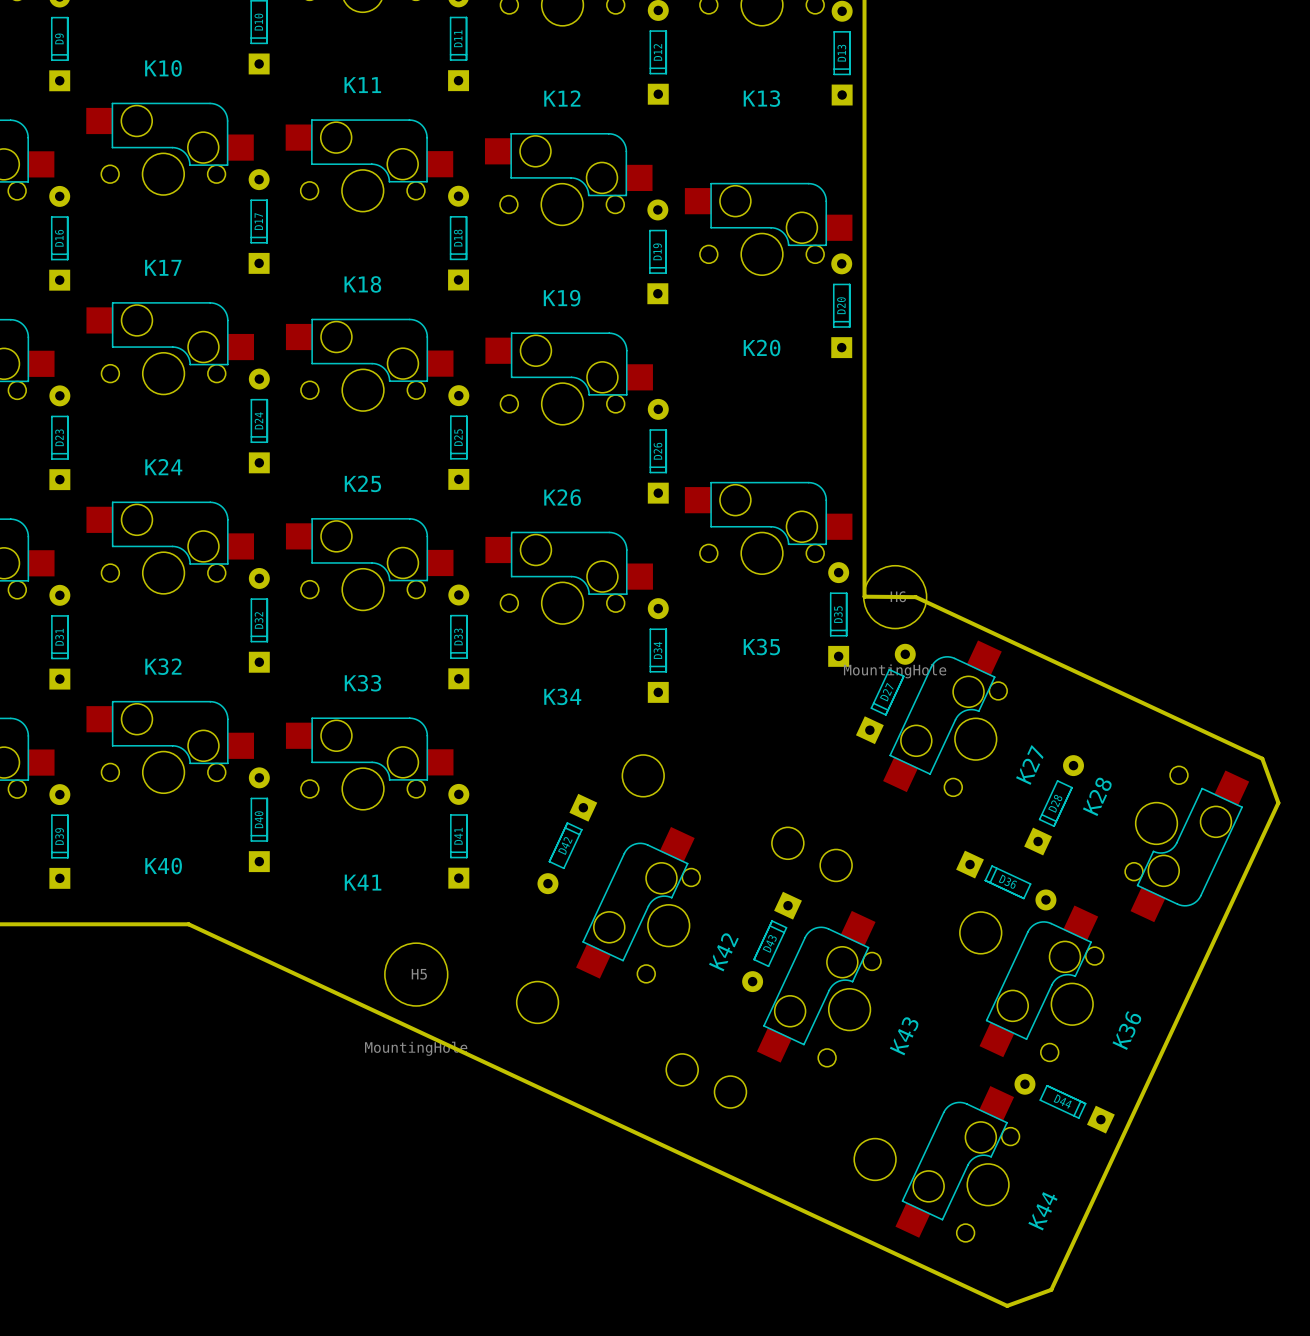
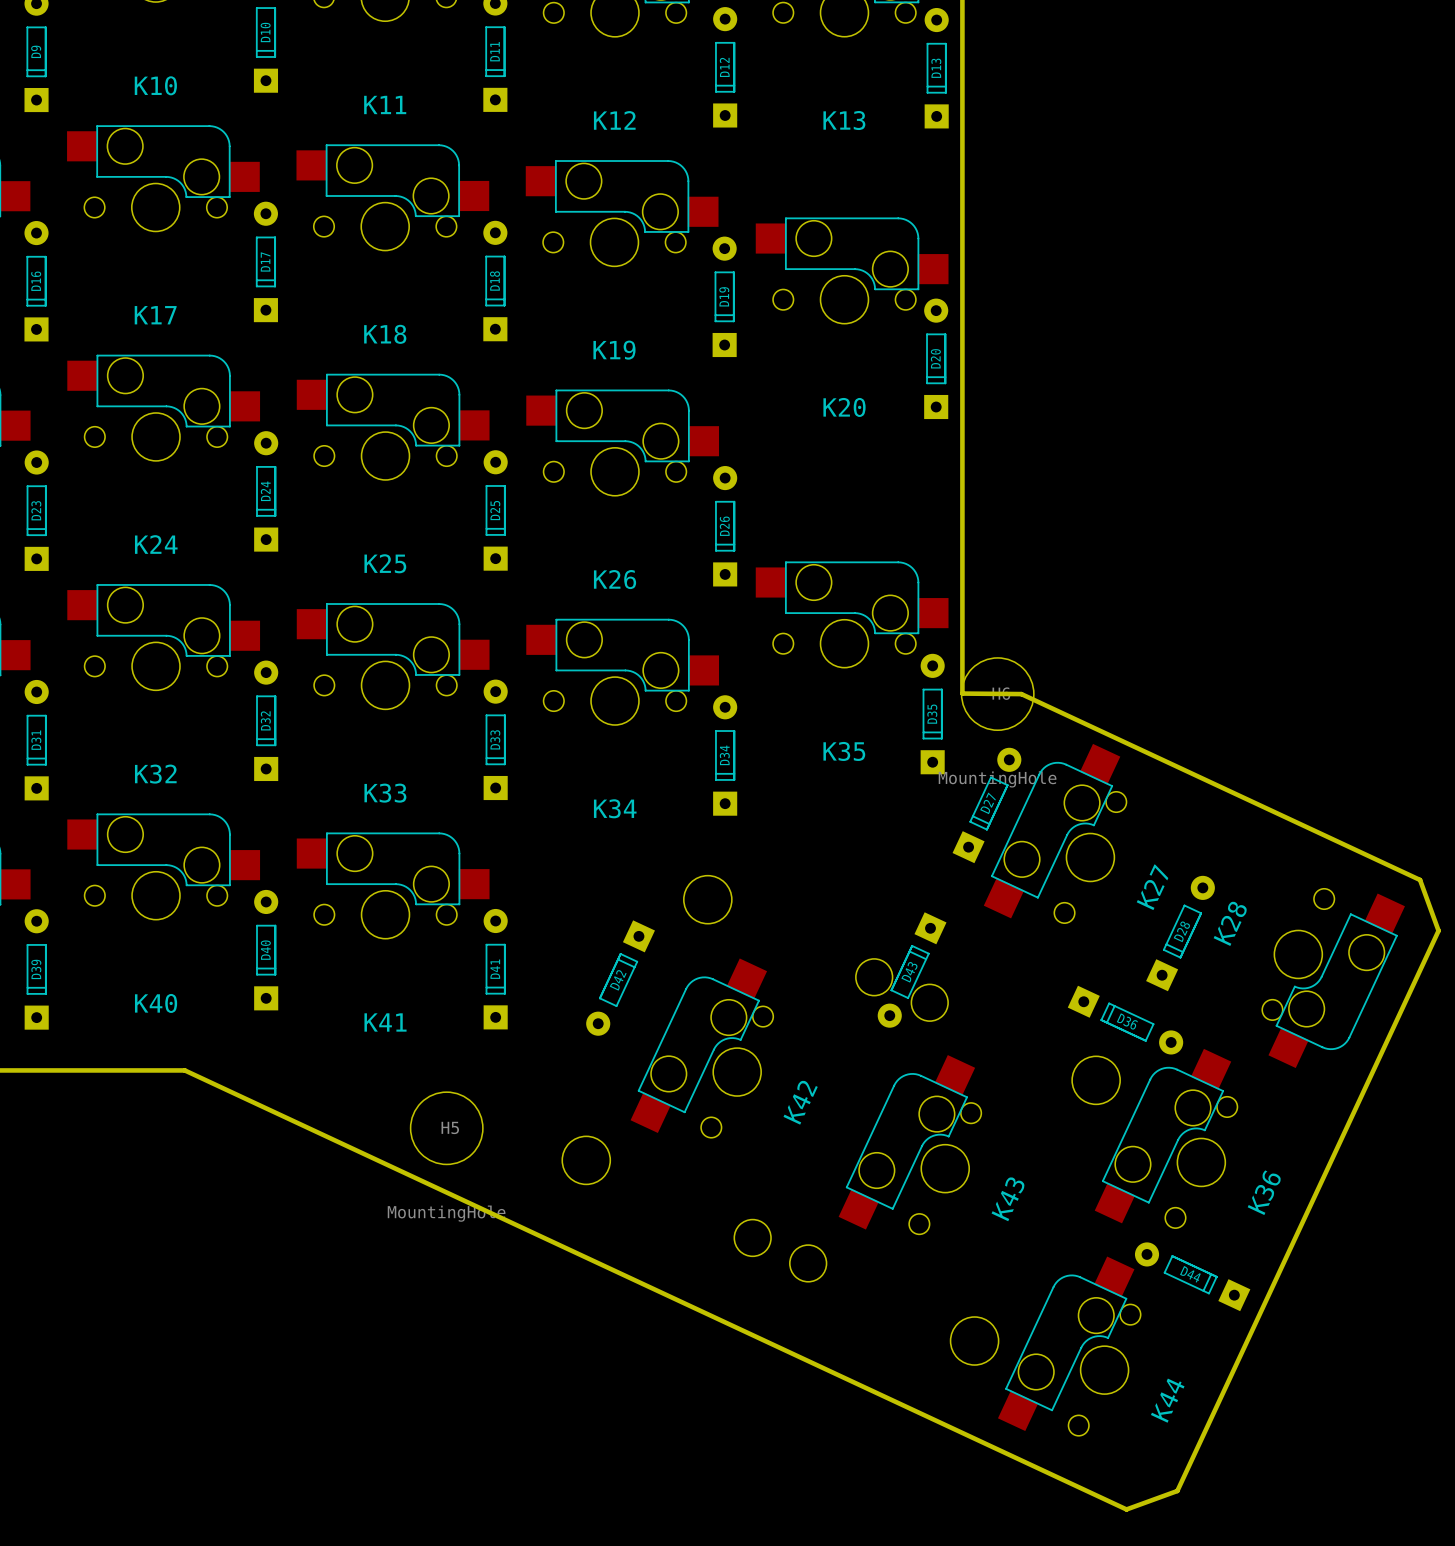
D43 position: (772, 941) -> (912, 970)

